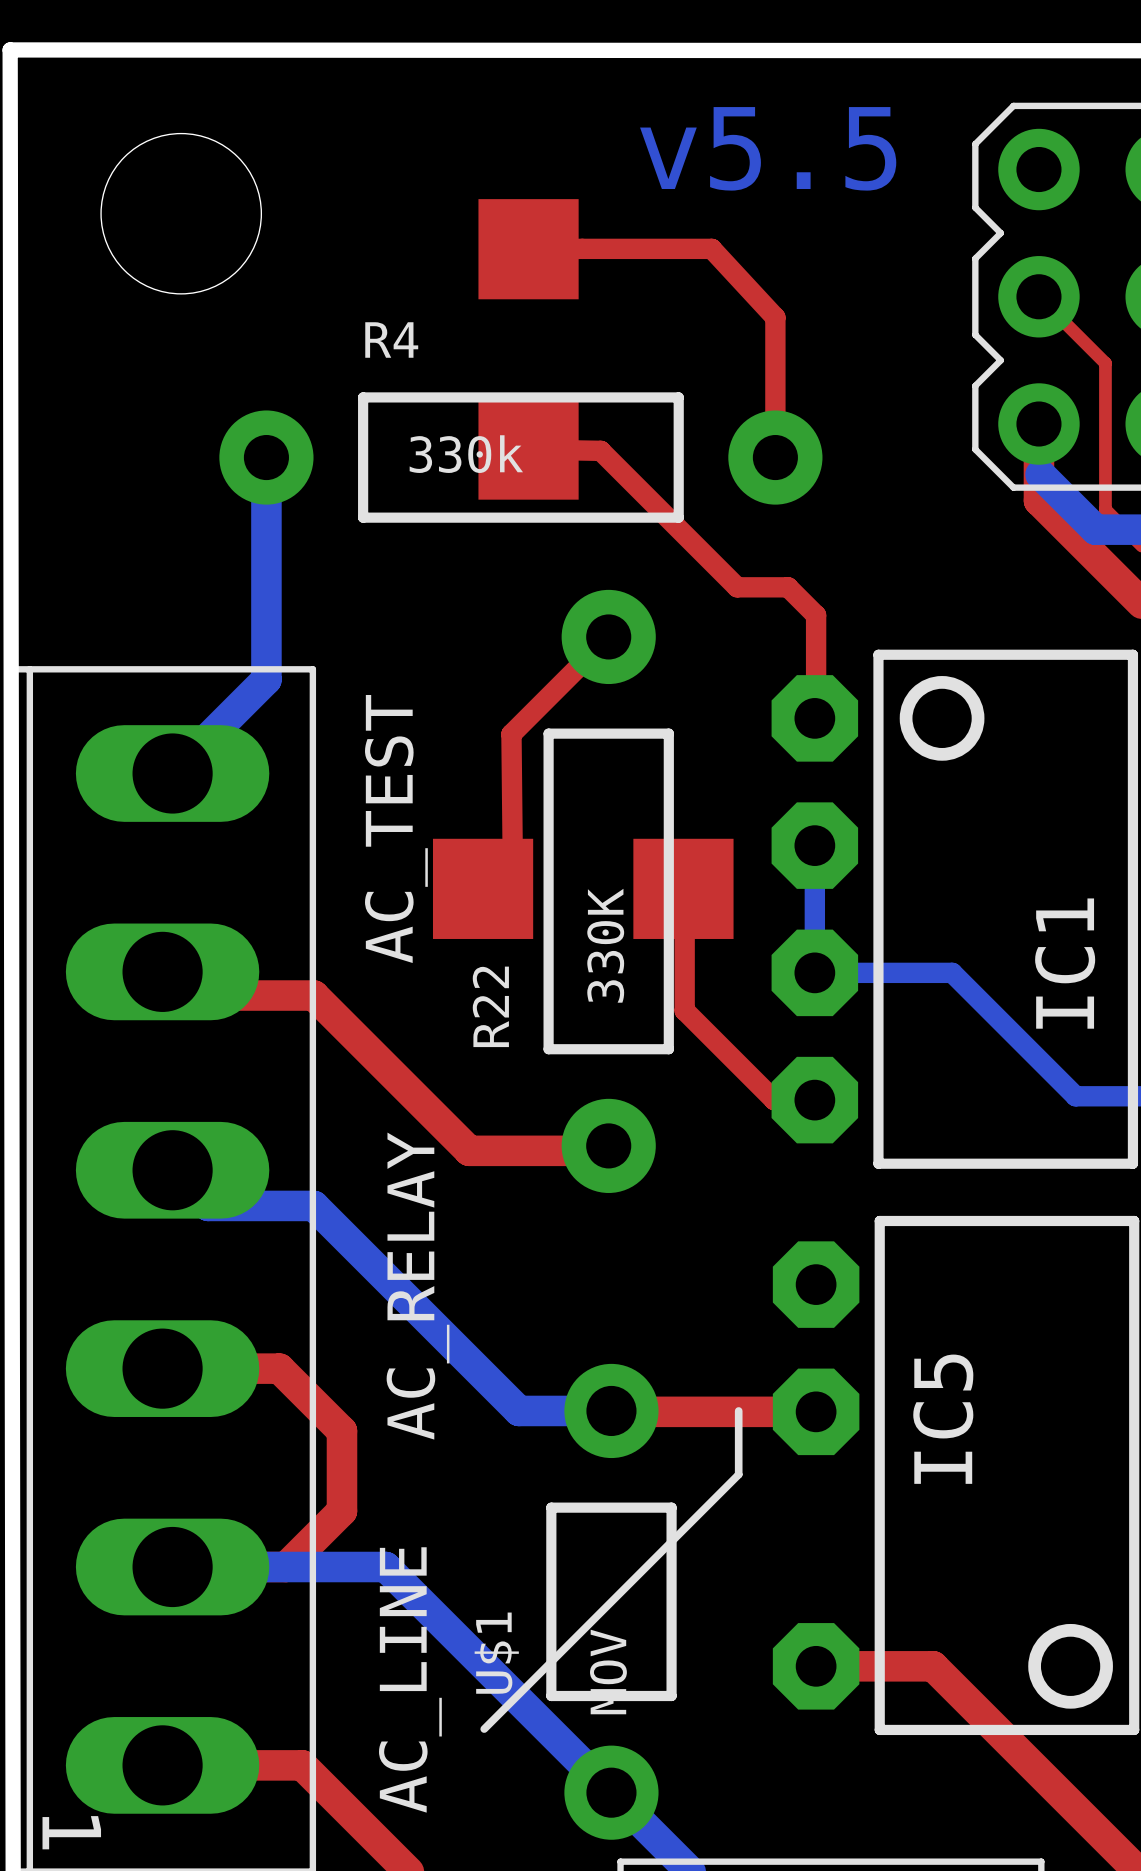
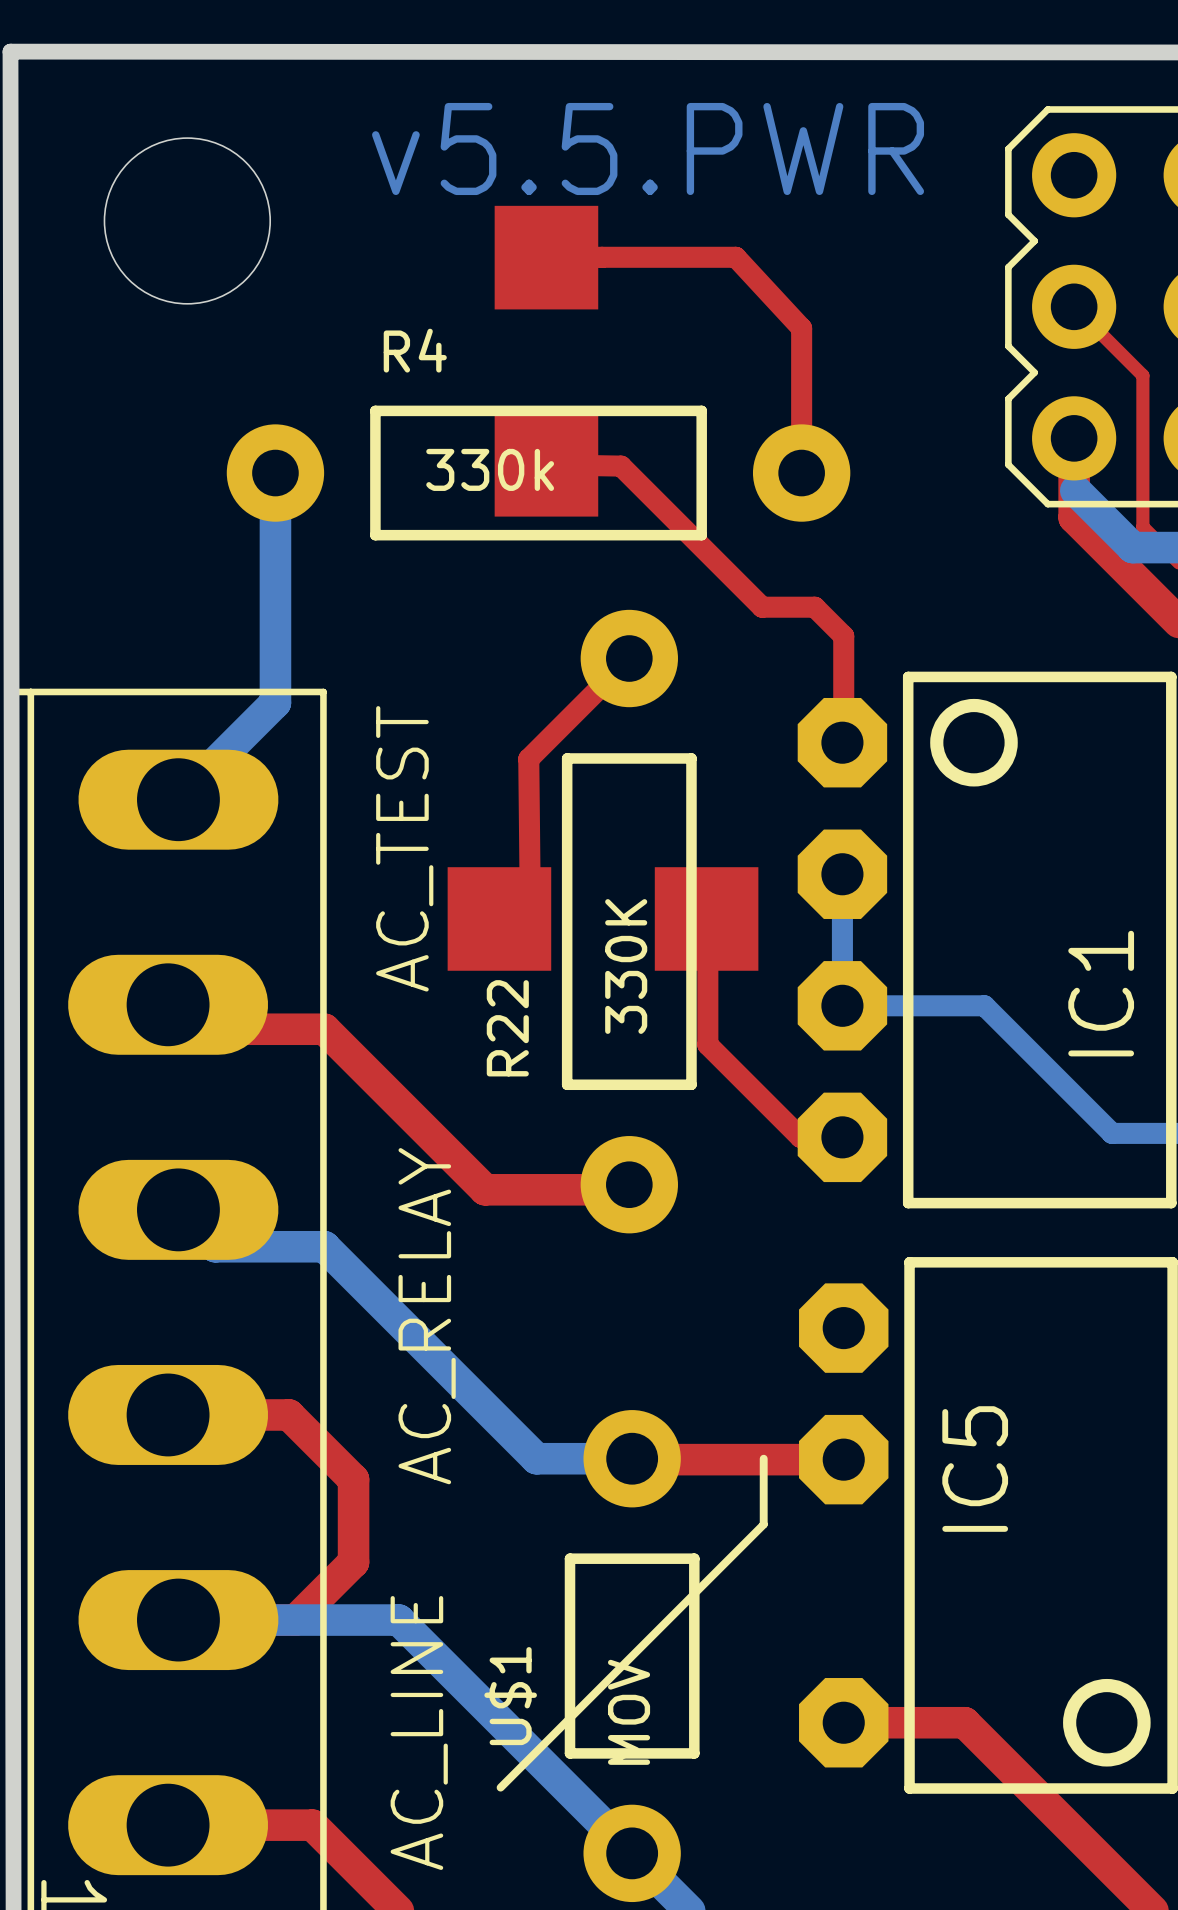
text: v5.5 (768, 148) -> v5.5.PWR (648, 148)

